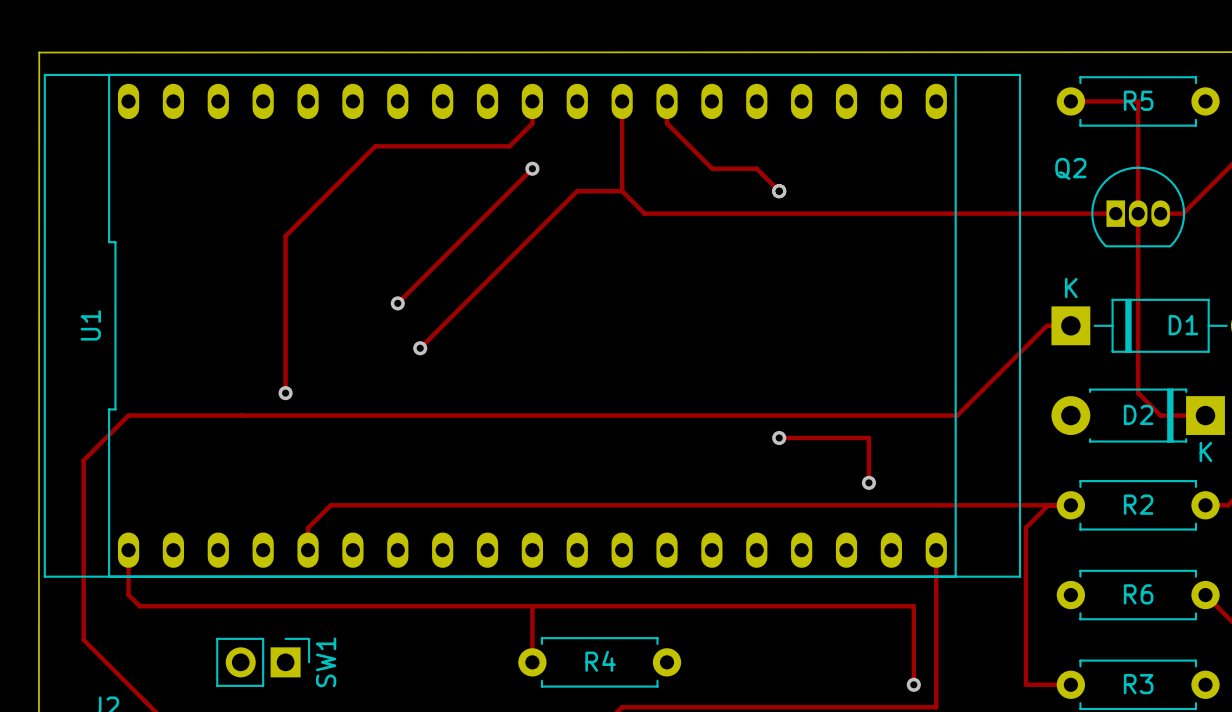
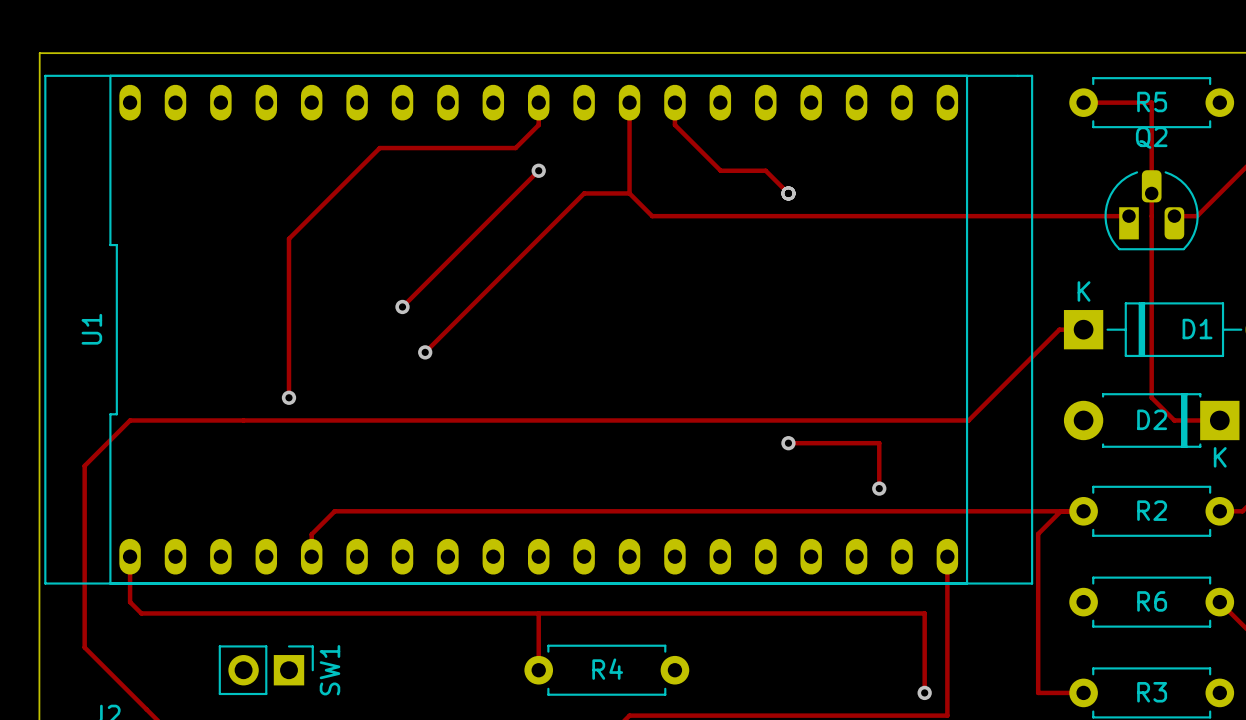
Q2 footprint: [1091, 166, 1186, 248] -> [1104, 170, 1199, 251]
Q2 name position: Q2 (1070, 168) -> Q2 (1151, 137)

